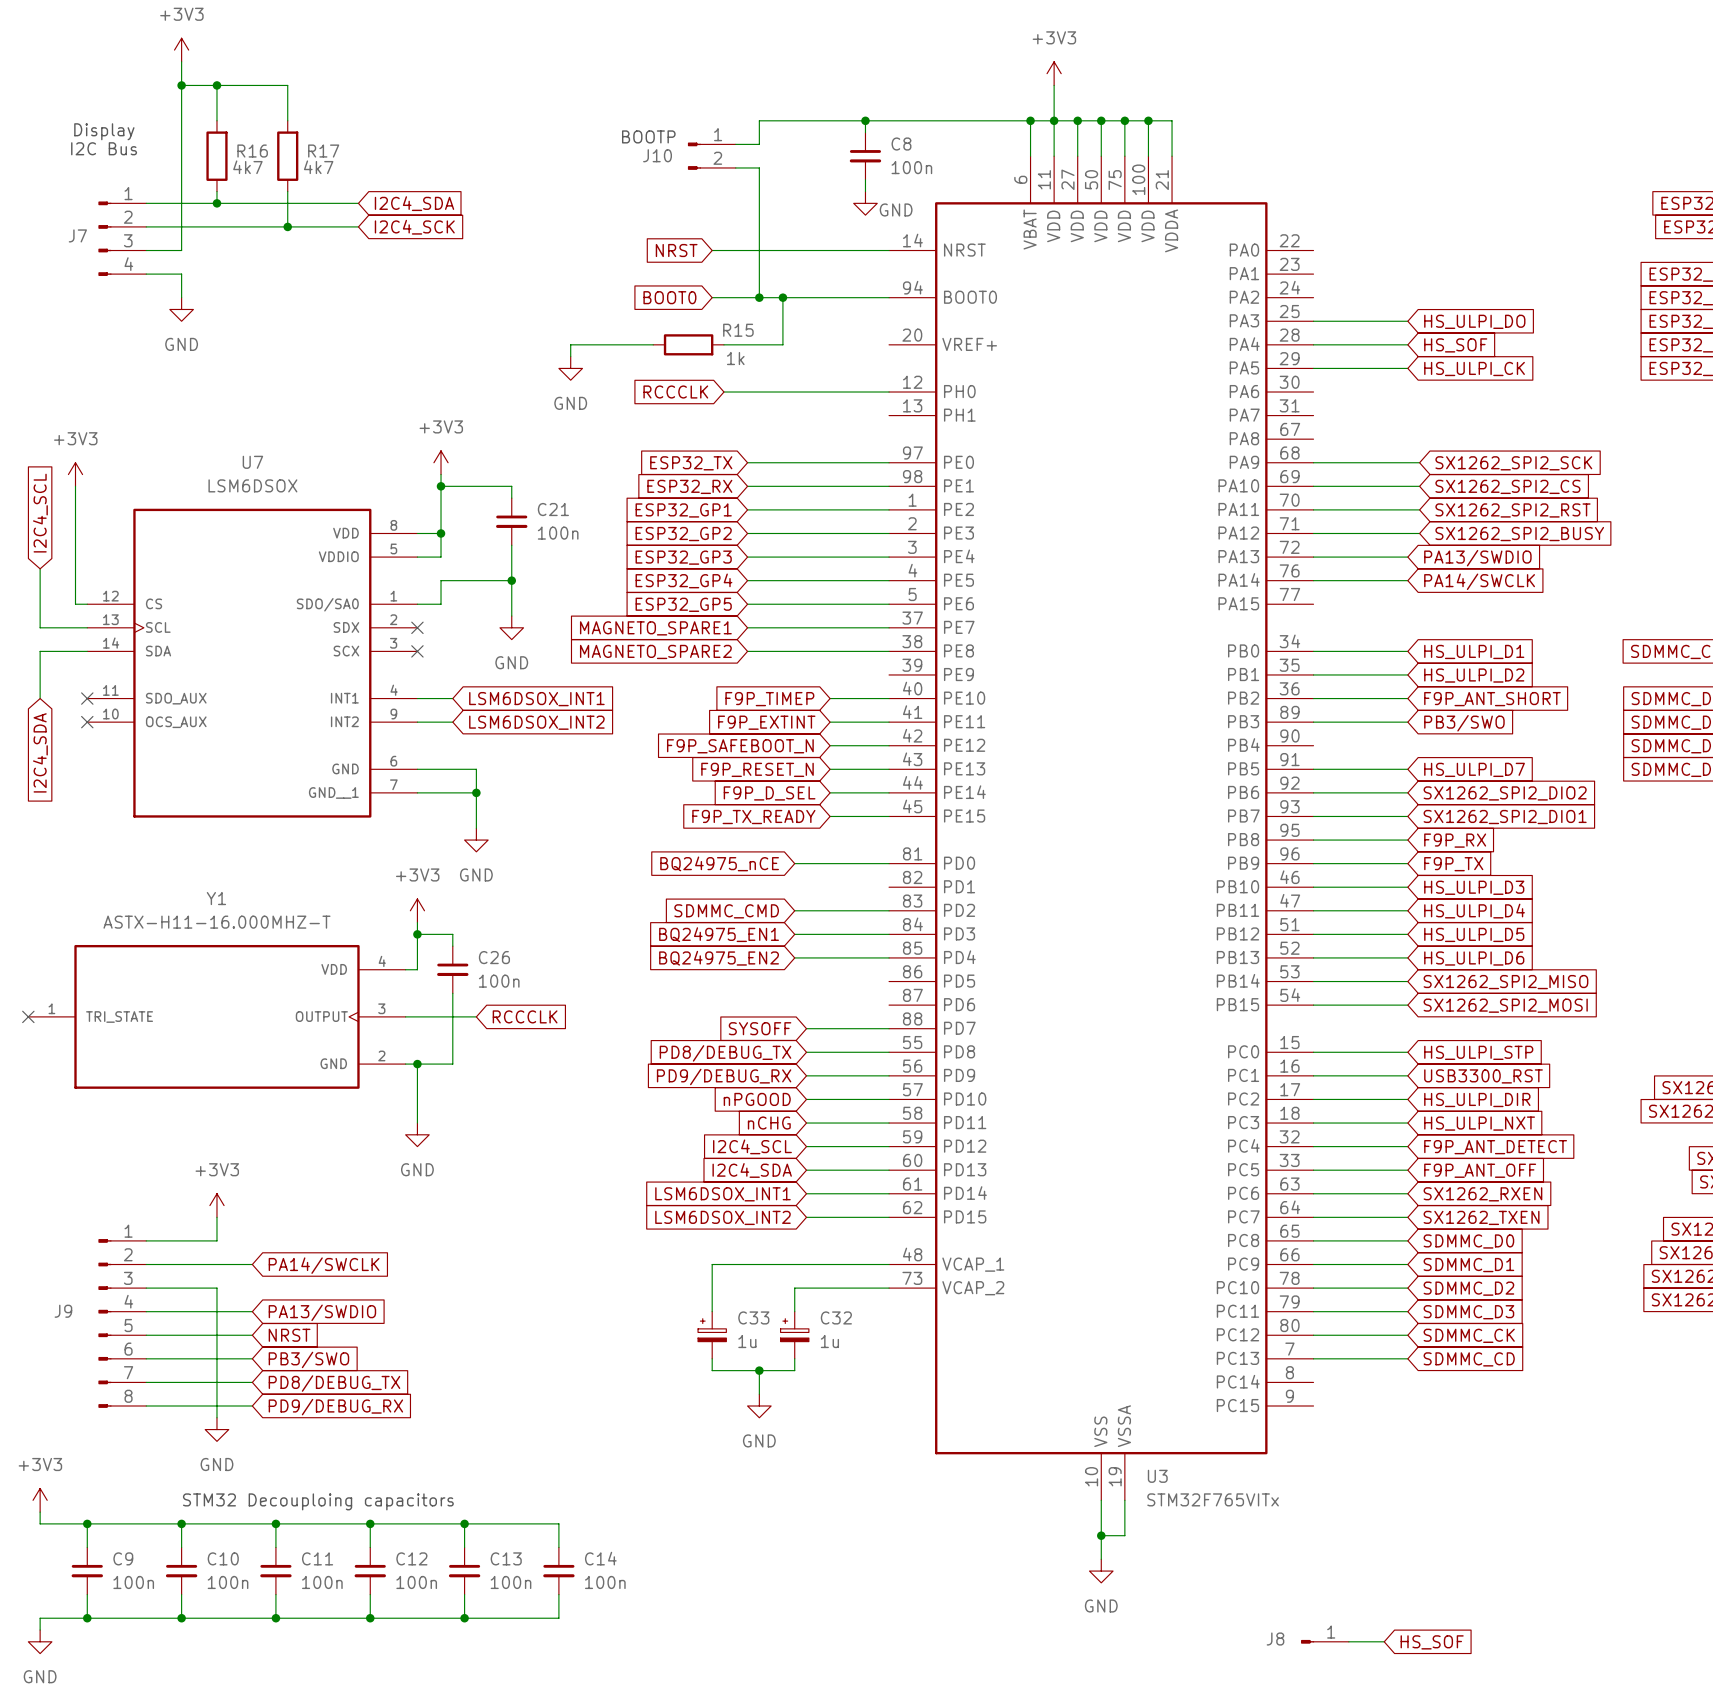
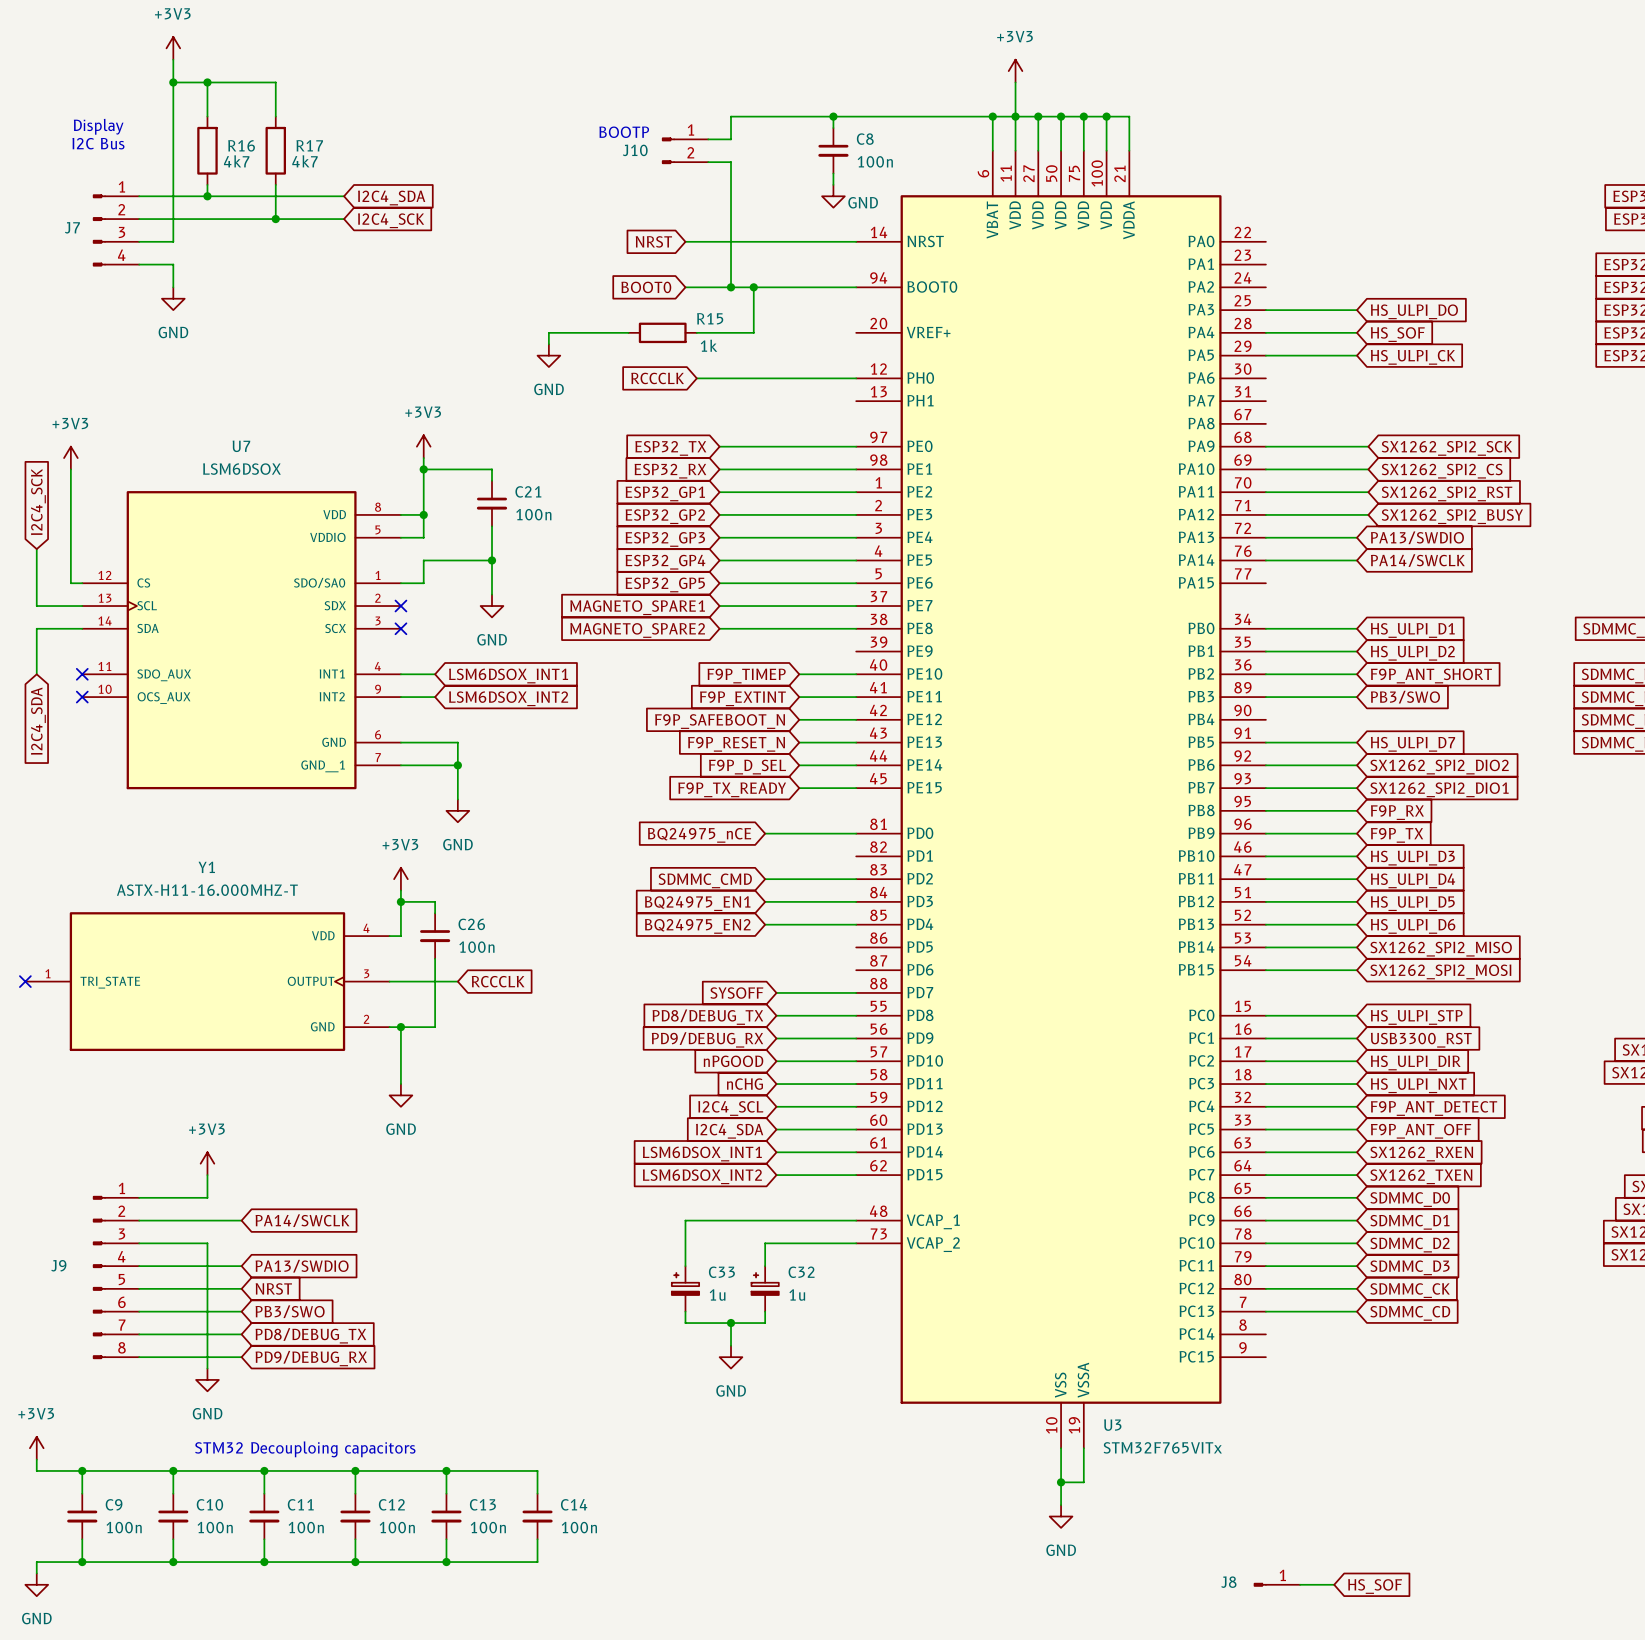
global label: I2C4_SCL (40, 513) -> I2C4_SCK (38, 502)

